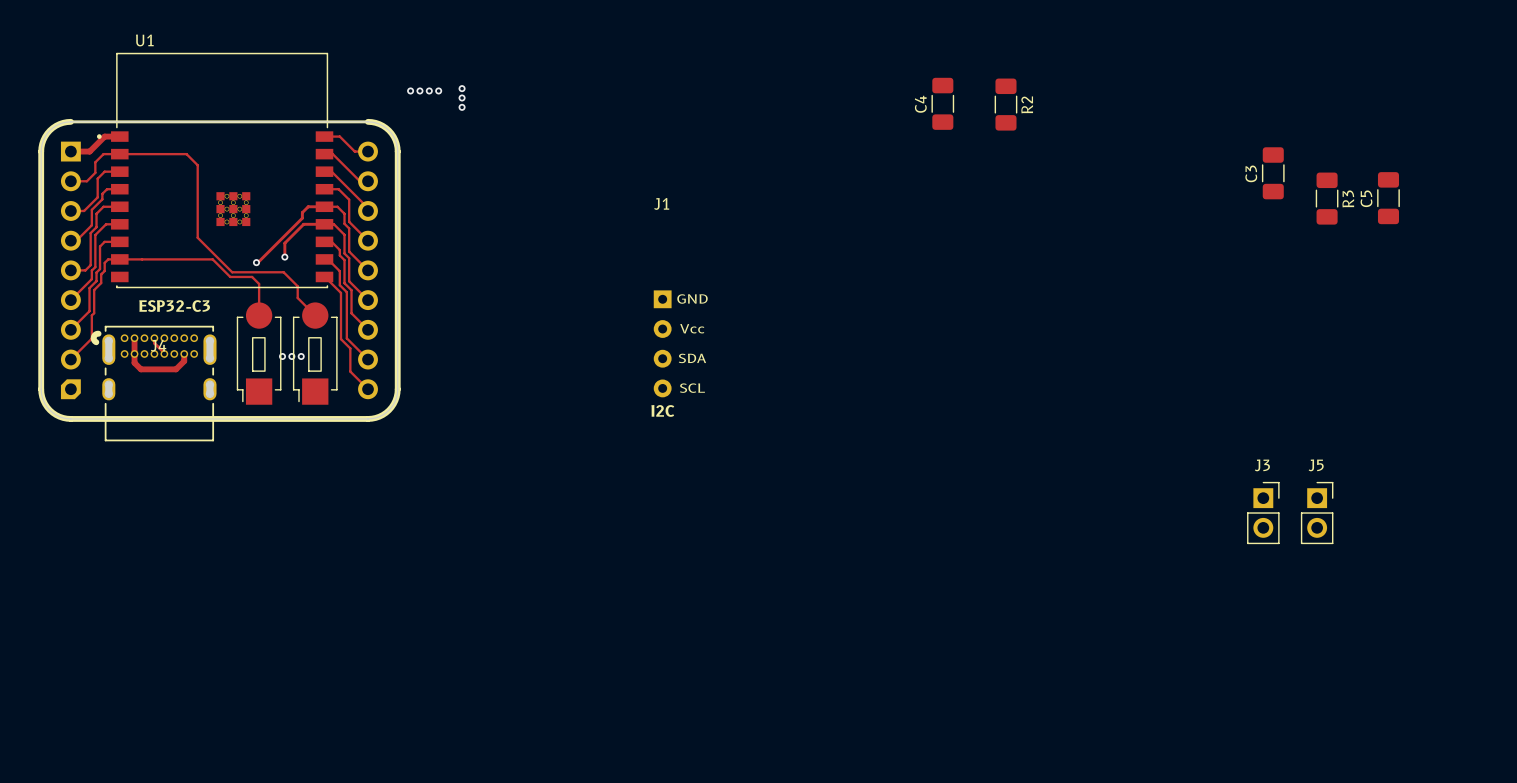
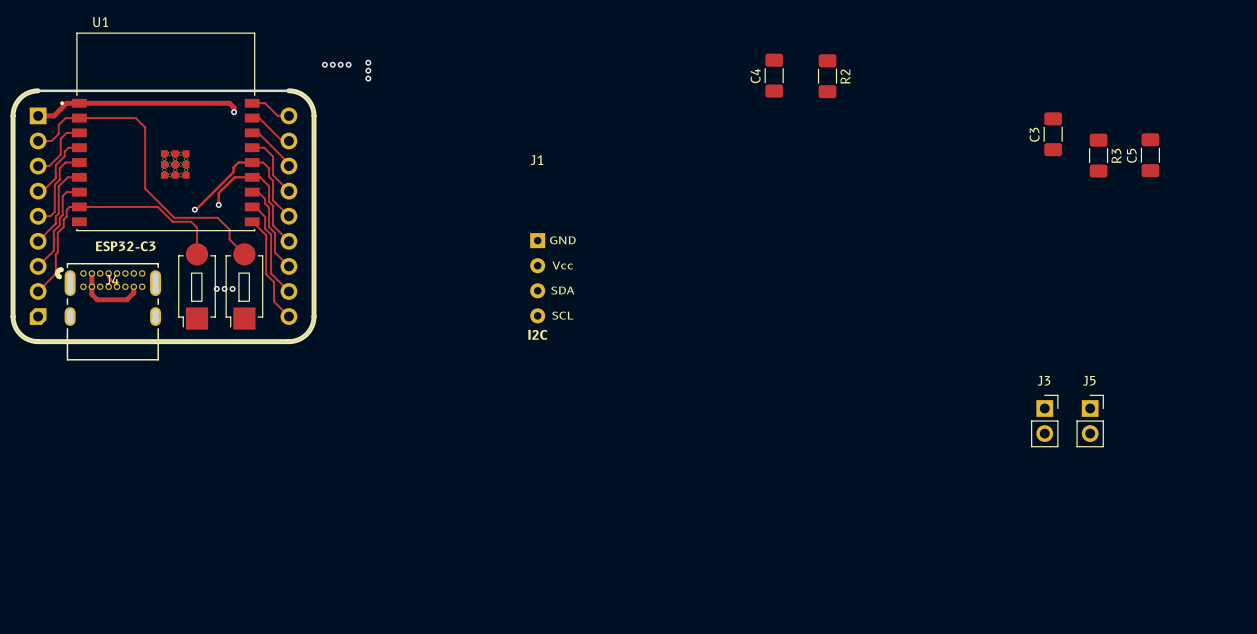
track: none -> (79, 103) (229, 103) (234, 107) (234, 112)
via: none -> (234, 112)

